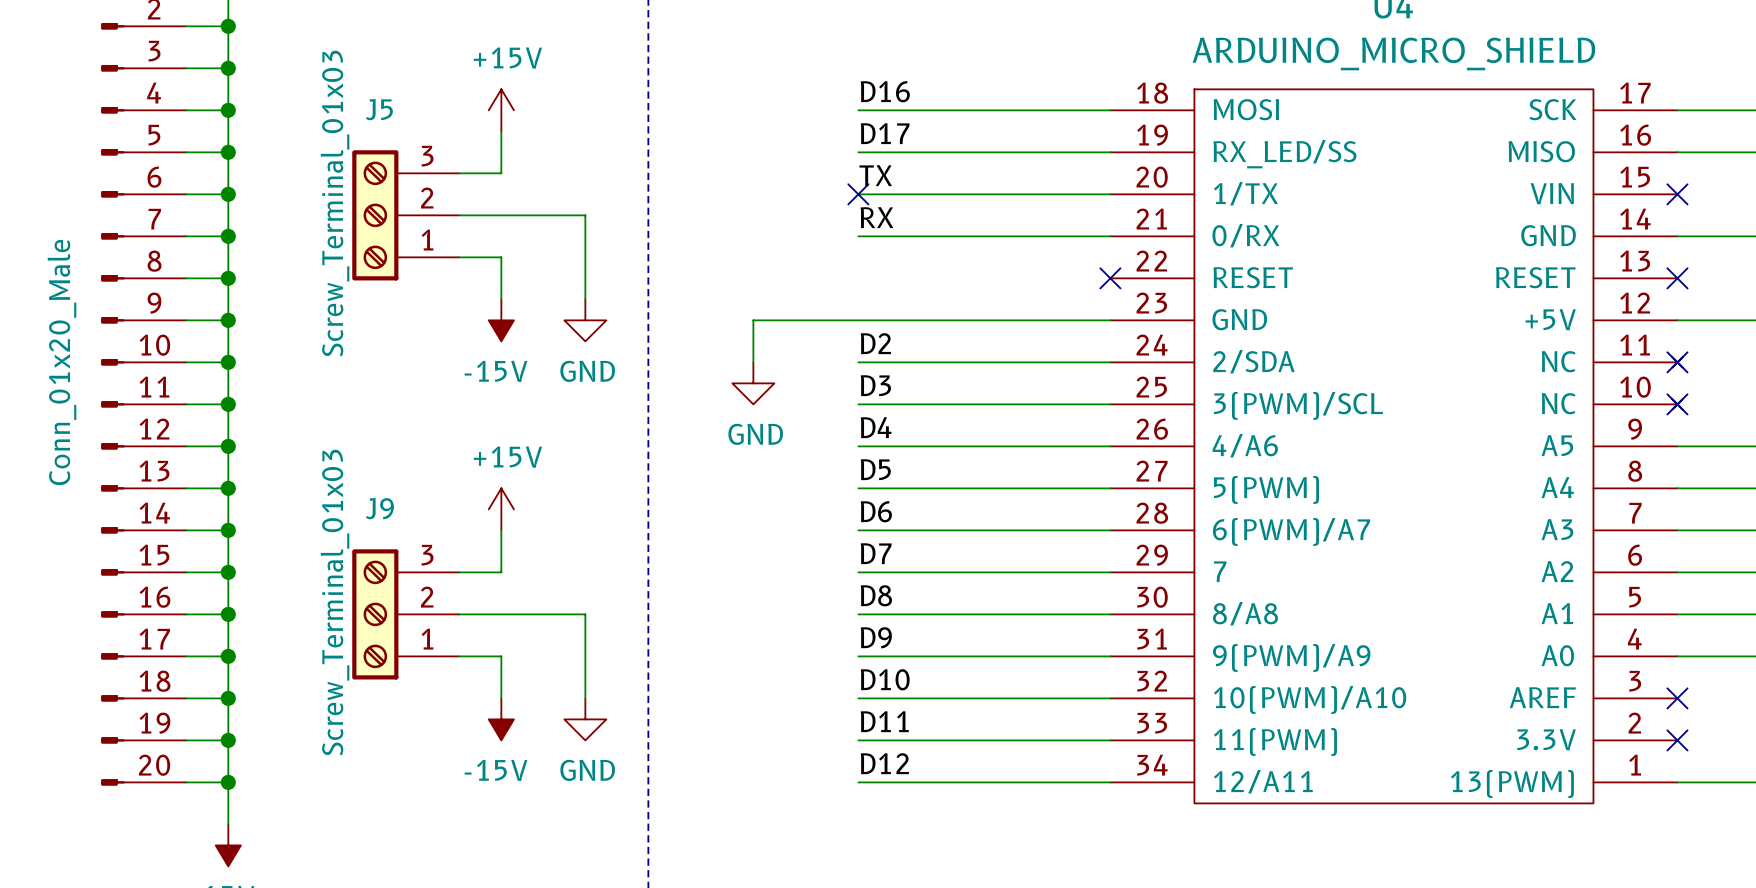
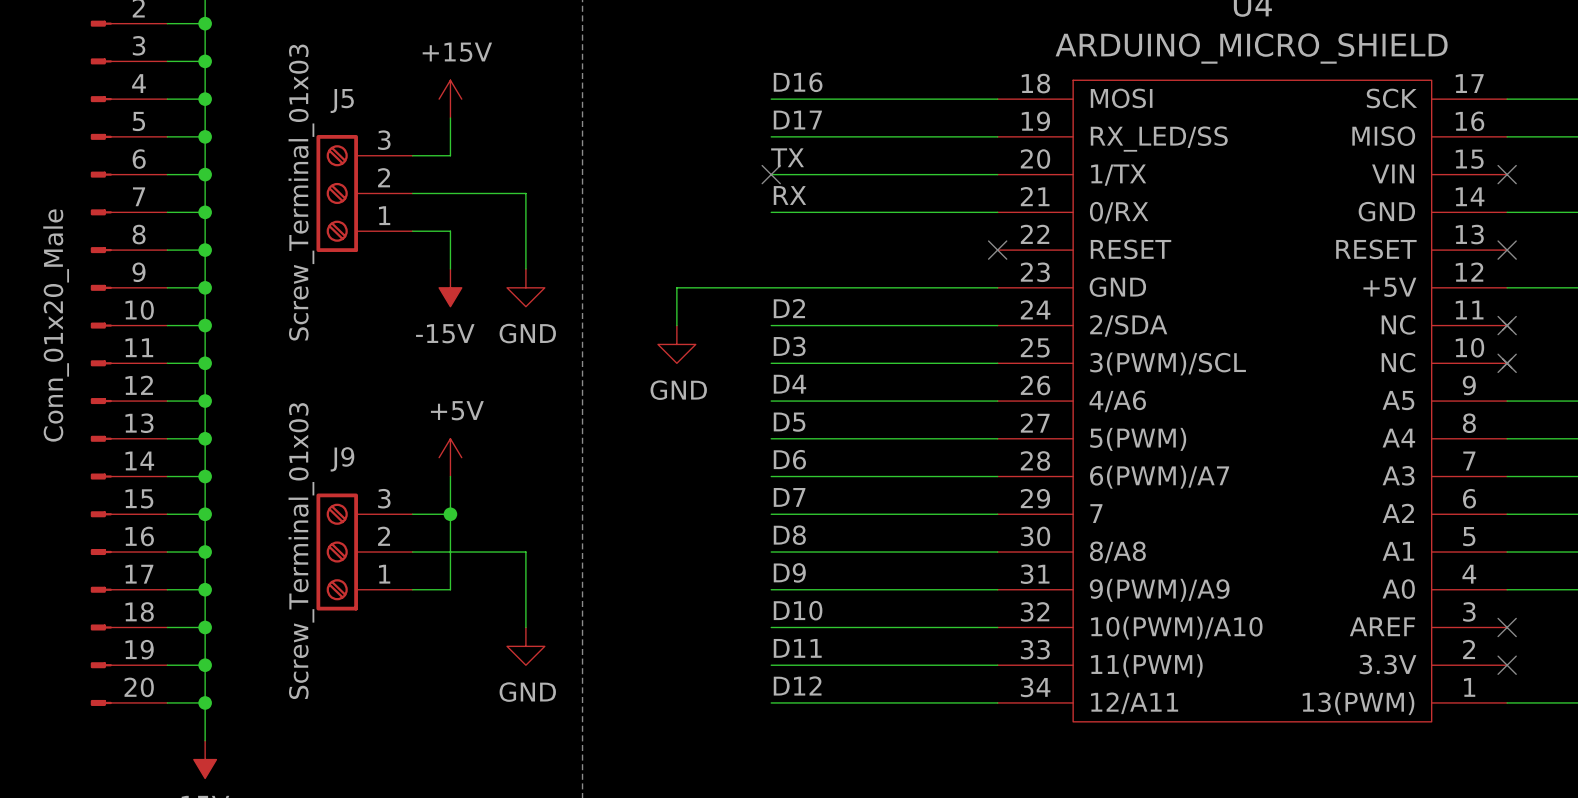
power symbol: +15V (501, 509) -> +5V (450, 457)
junction: none -> (450, 514)
wire: (501, 656) (501, 698) -> (450, 589) (450, 514)
power symbol: -15V (501, 719) -> none

